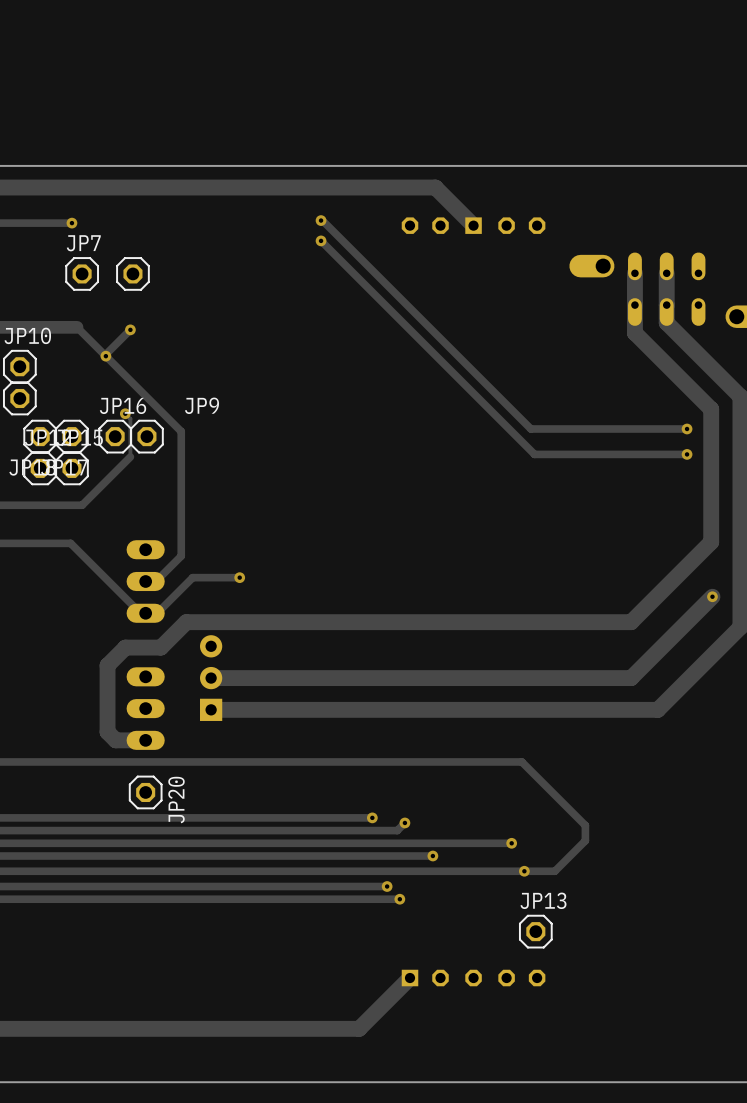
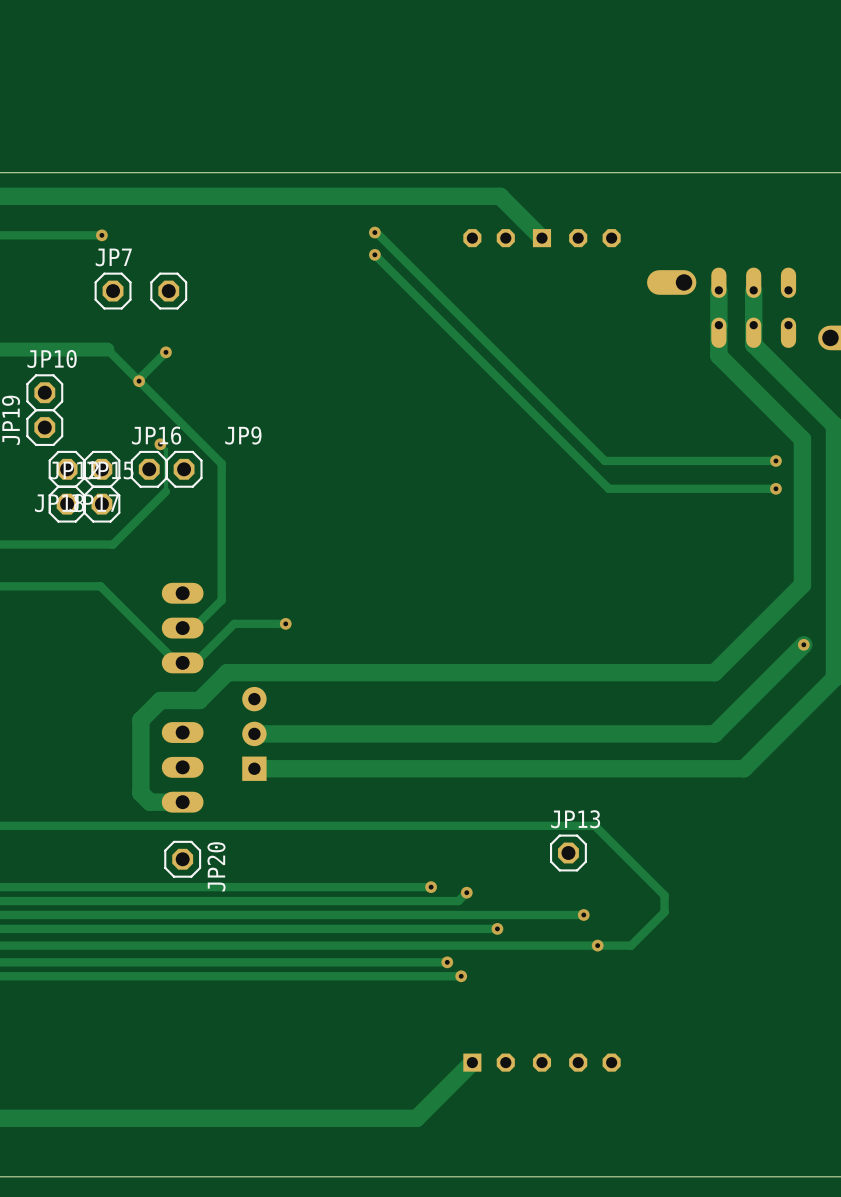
JP13 position: (535, 931) -> (568, 853)

